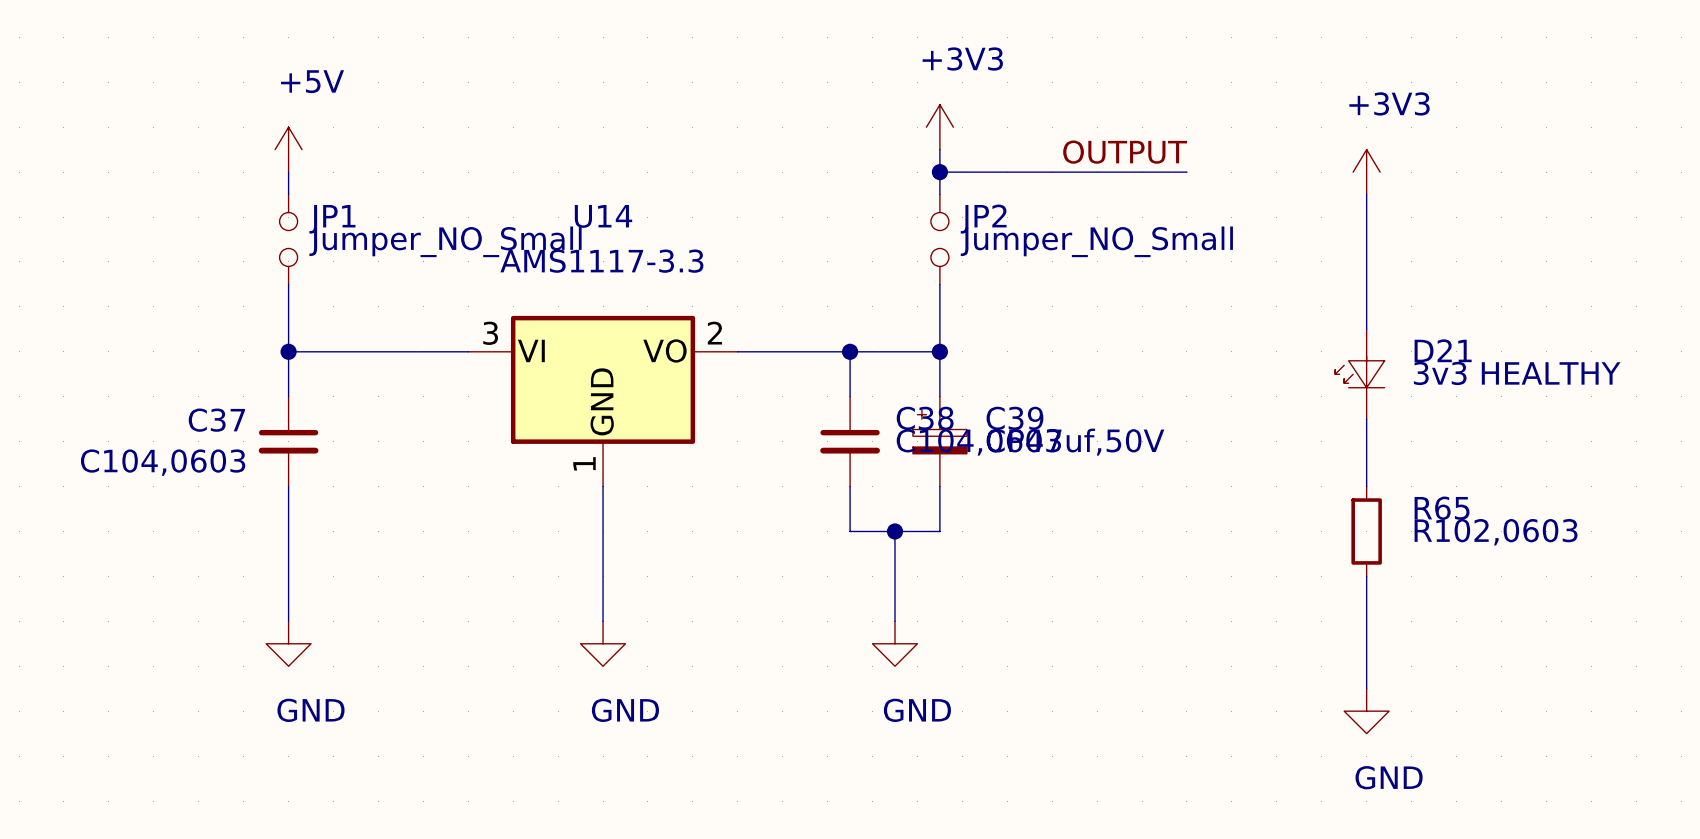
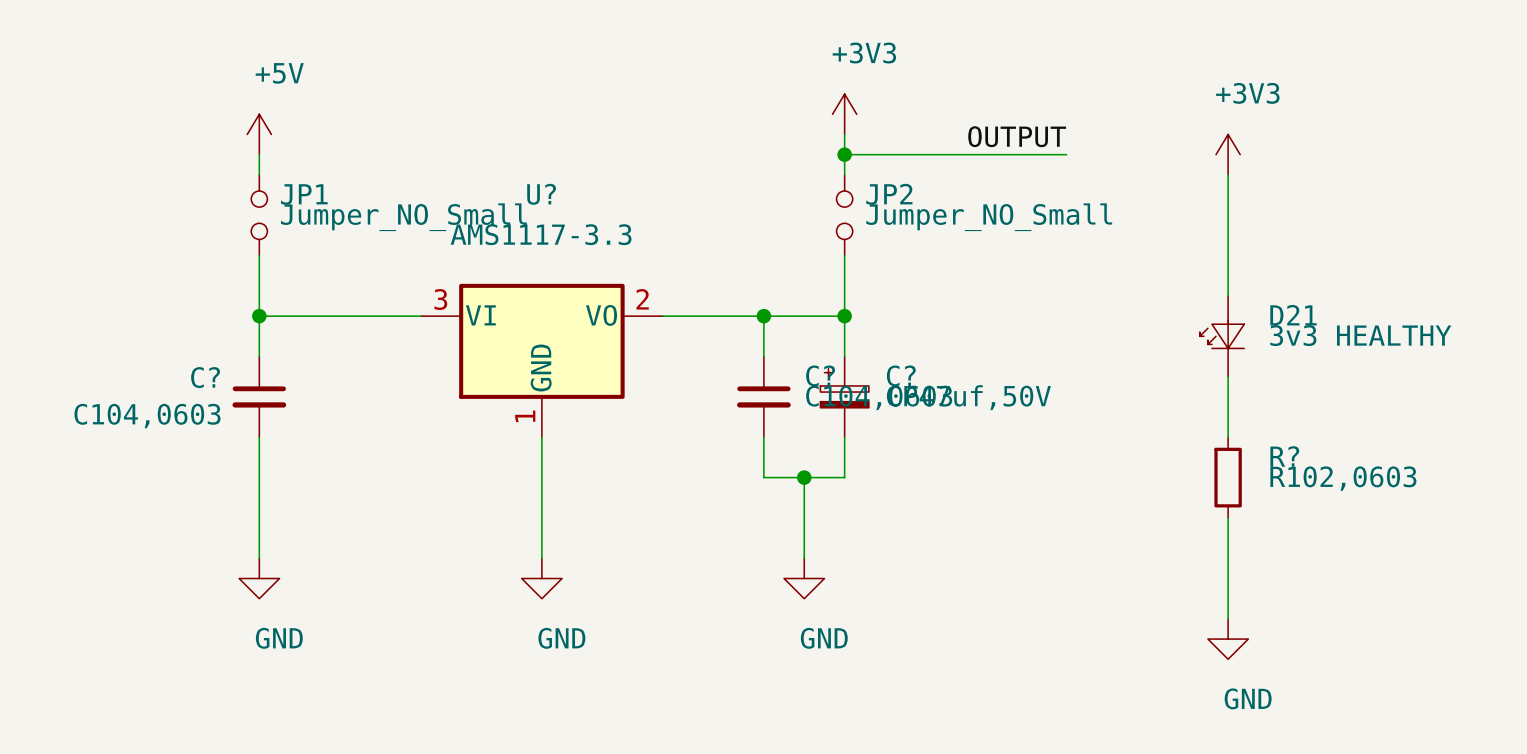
U14 name: U14 (603, 216) -> U? (541, 194)
C38 name: C38 (925, 418) -> C? (820, 375)
C39 name: C39 (1014, 418) -> C? (901, 375)
C37 name: C37 (216, 420) -> C? (205, 377)
R65 name: R65 (1442, 508) -> R? (1284, 456)

